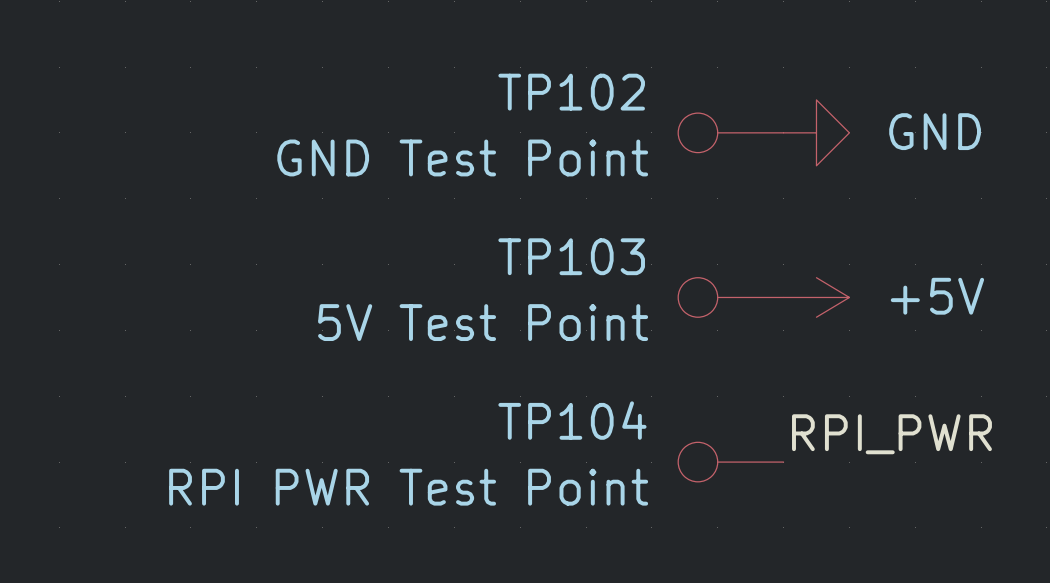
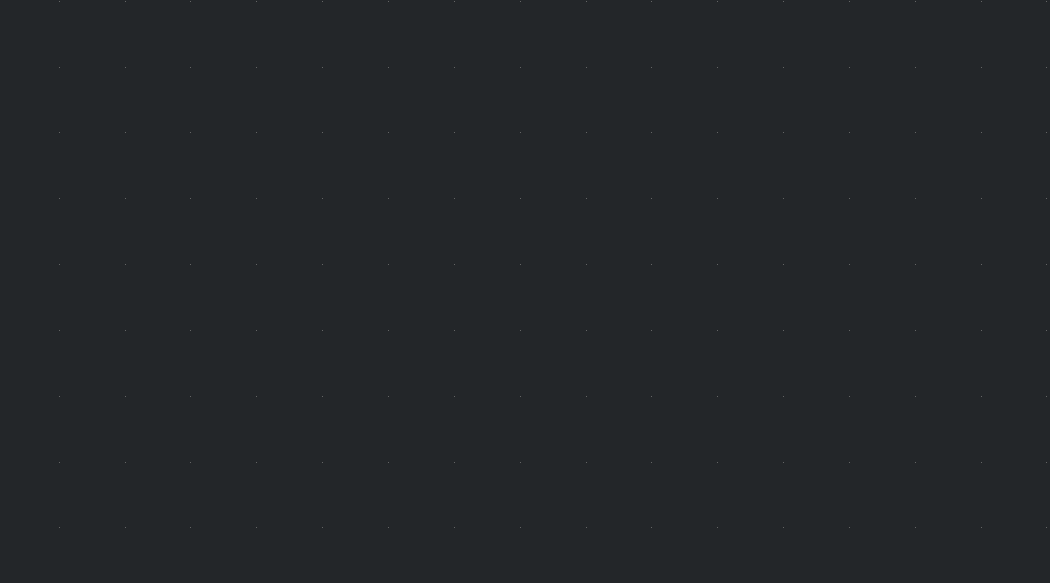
TP102: GND Test Point (730, 132) -> none
power symbol: GND (816, 132) -> none
TP103: 5V Test Point (730, 297) -> none
power symbol: +5V (816, 297) -> none
label: RPI_PWR (891, 434) -> none
TP104: RPI PWR Test Point (730, 462) -> none

